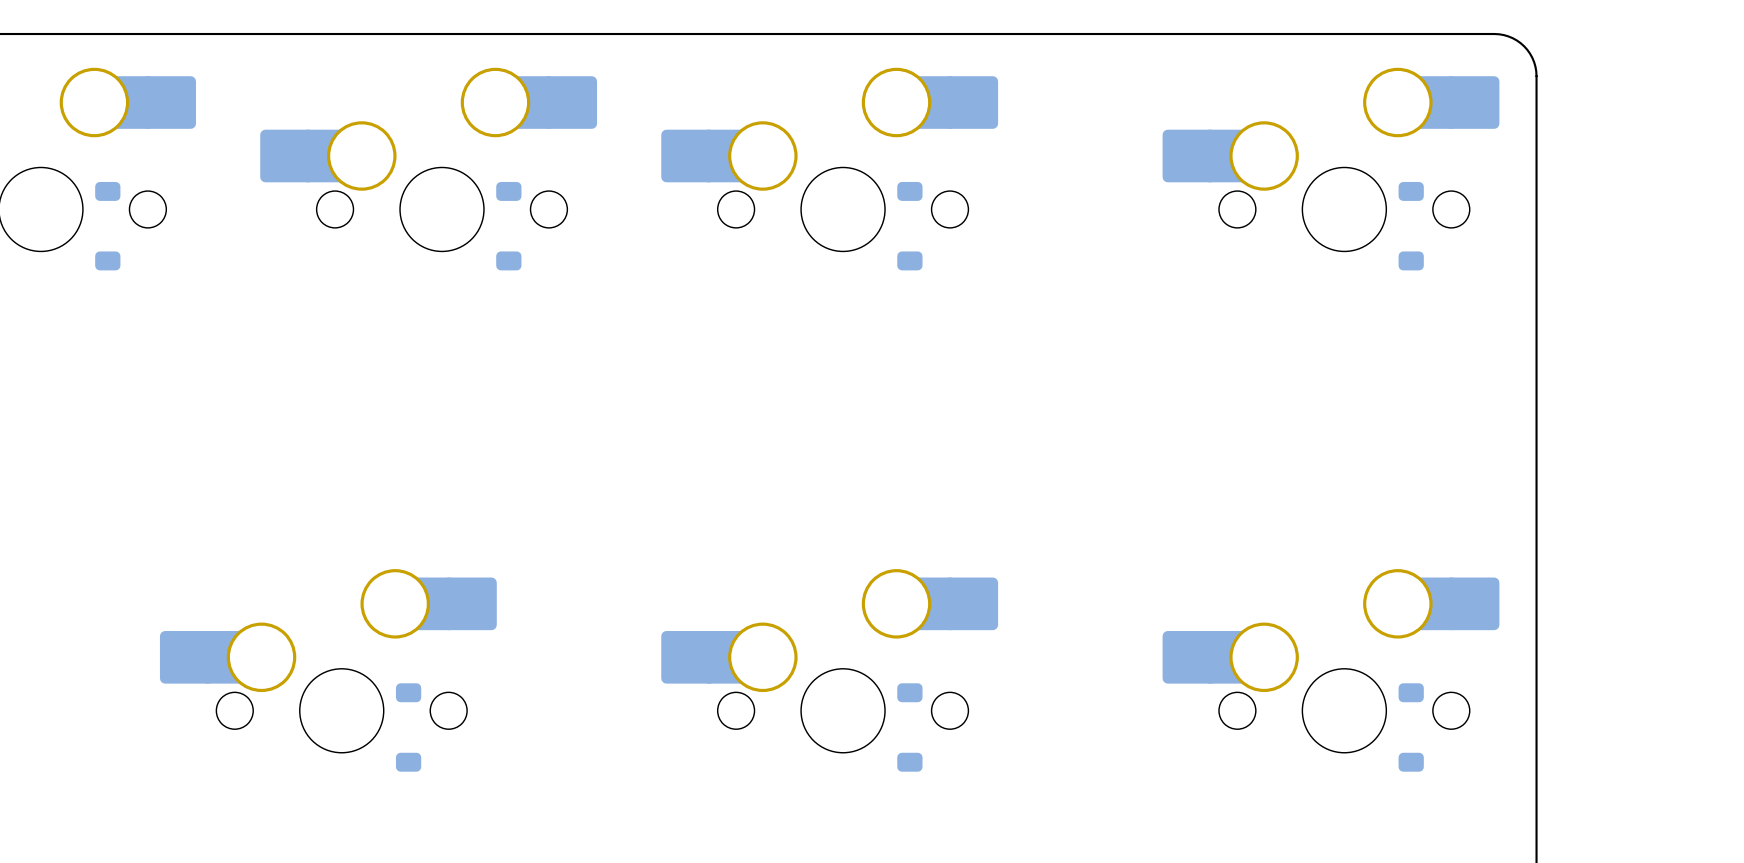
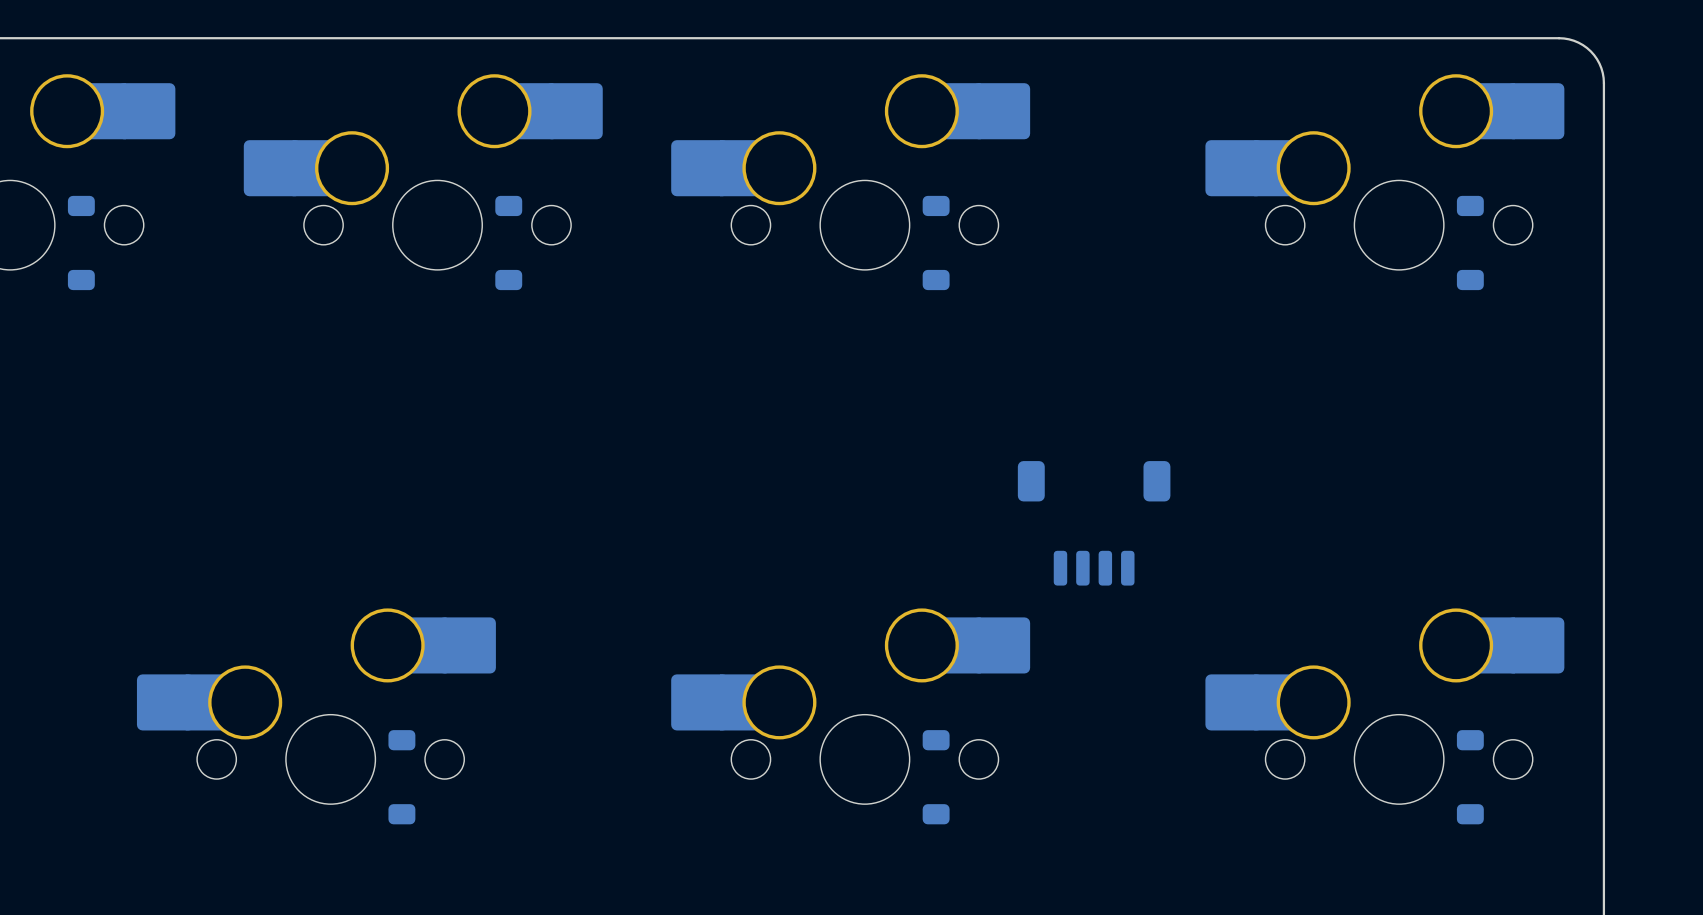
part: none -> (1094, 523)

